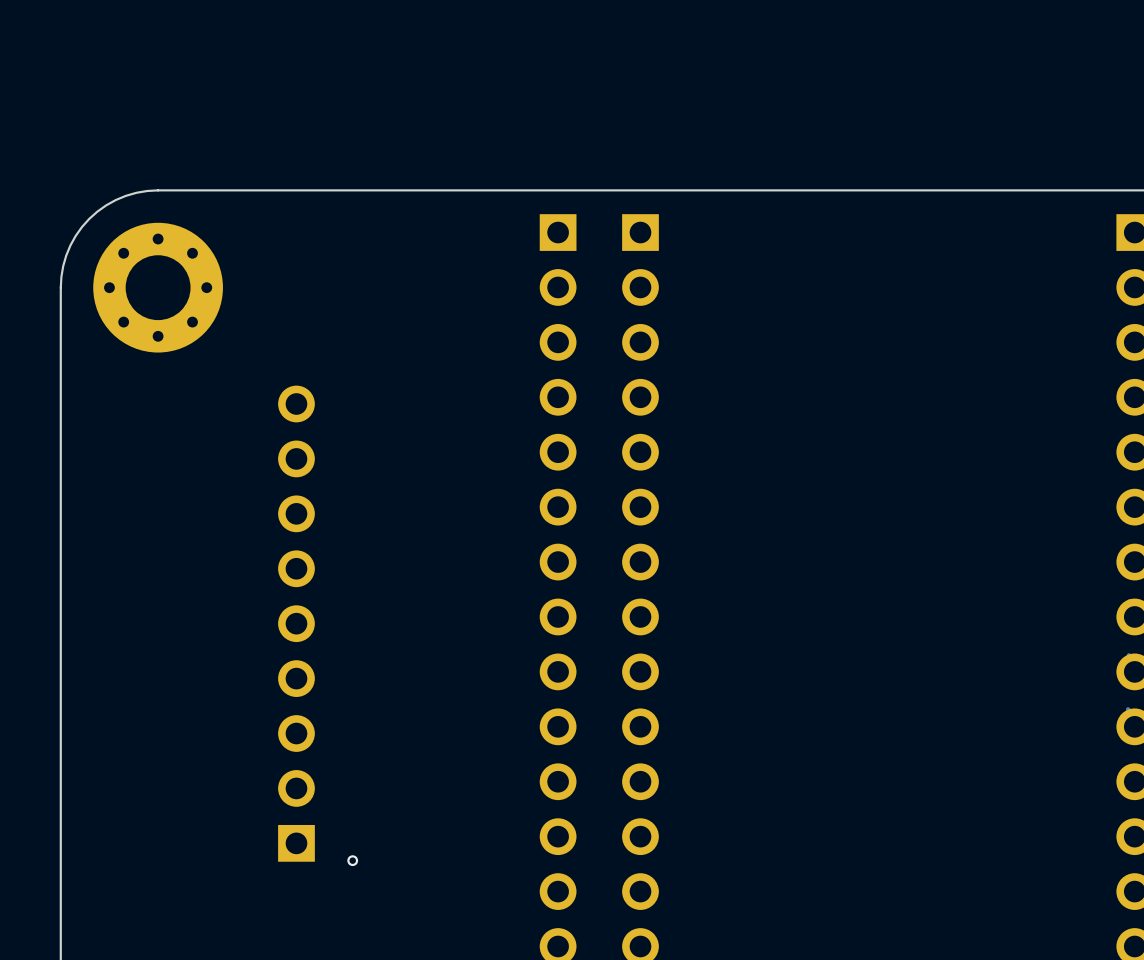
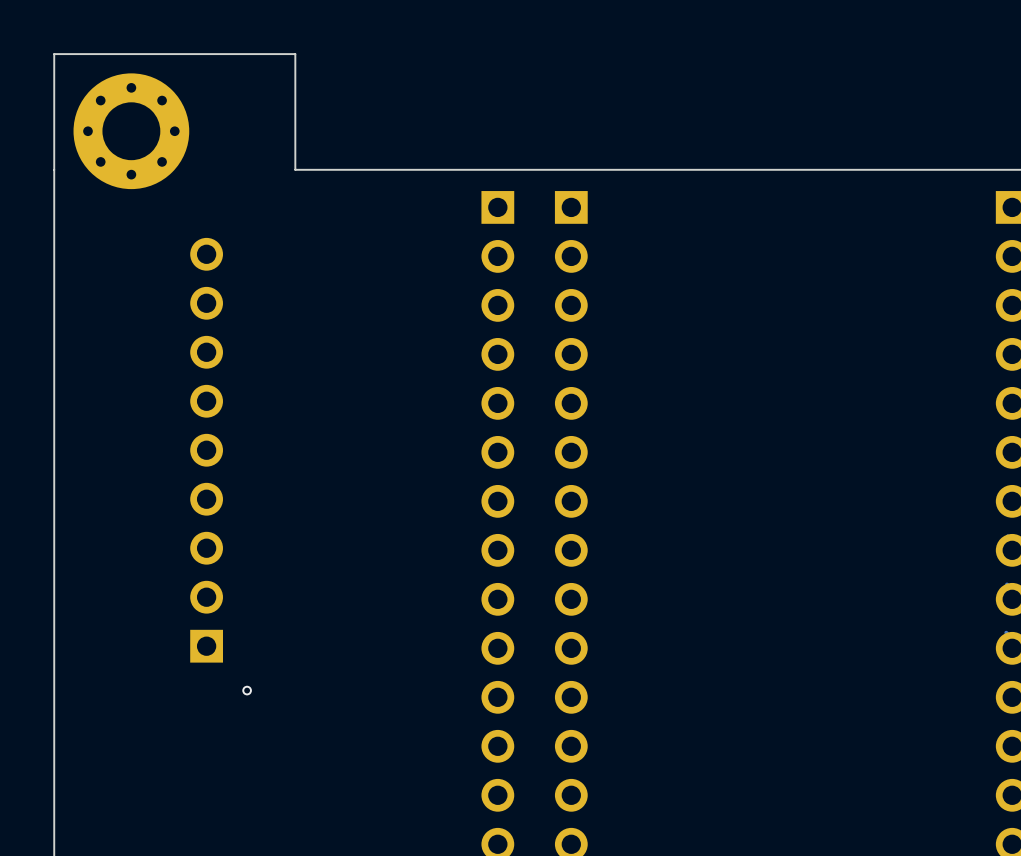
board edge: (331, 190) (158, 190) (125, 195) (97, 211) (75, 235) (63, 266) (60, 287) -> (295, 169) (295, 54) (54, 54) (54, 256)
part position: (158, 287) -> (131, 131)
part position: (296, 623) -> (206, 450)
via position: (352, 860) -> (247, 690)

